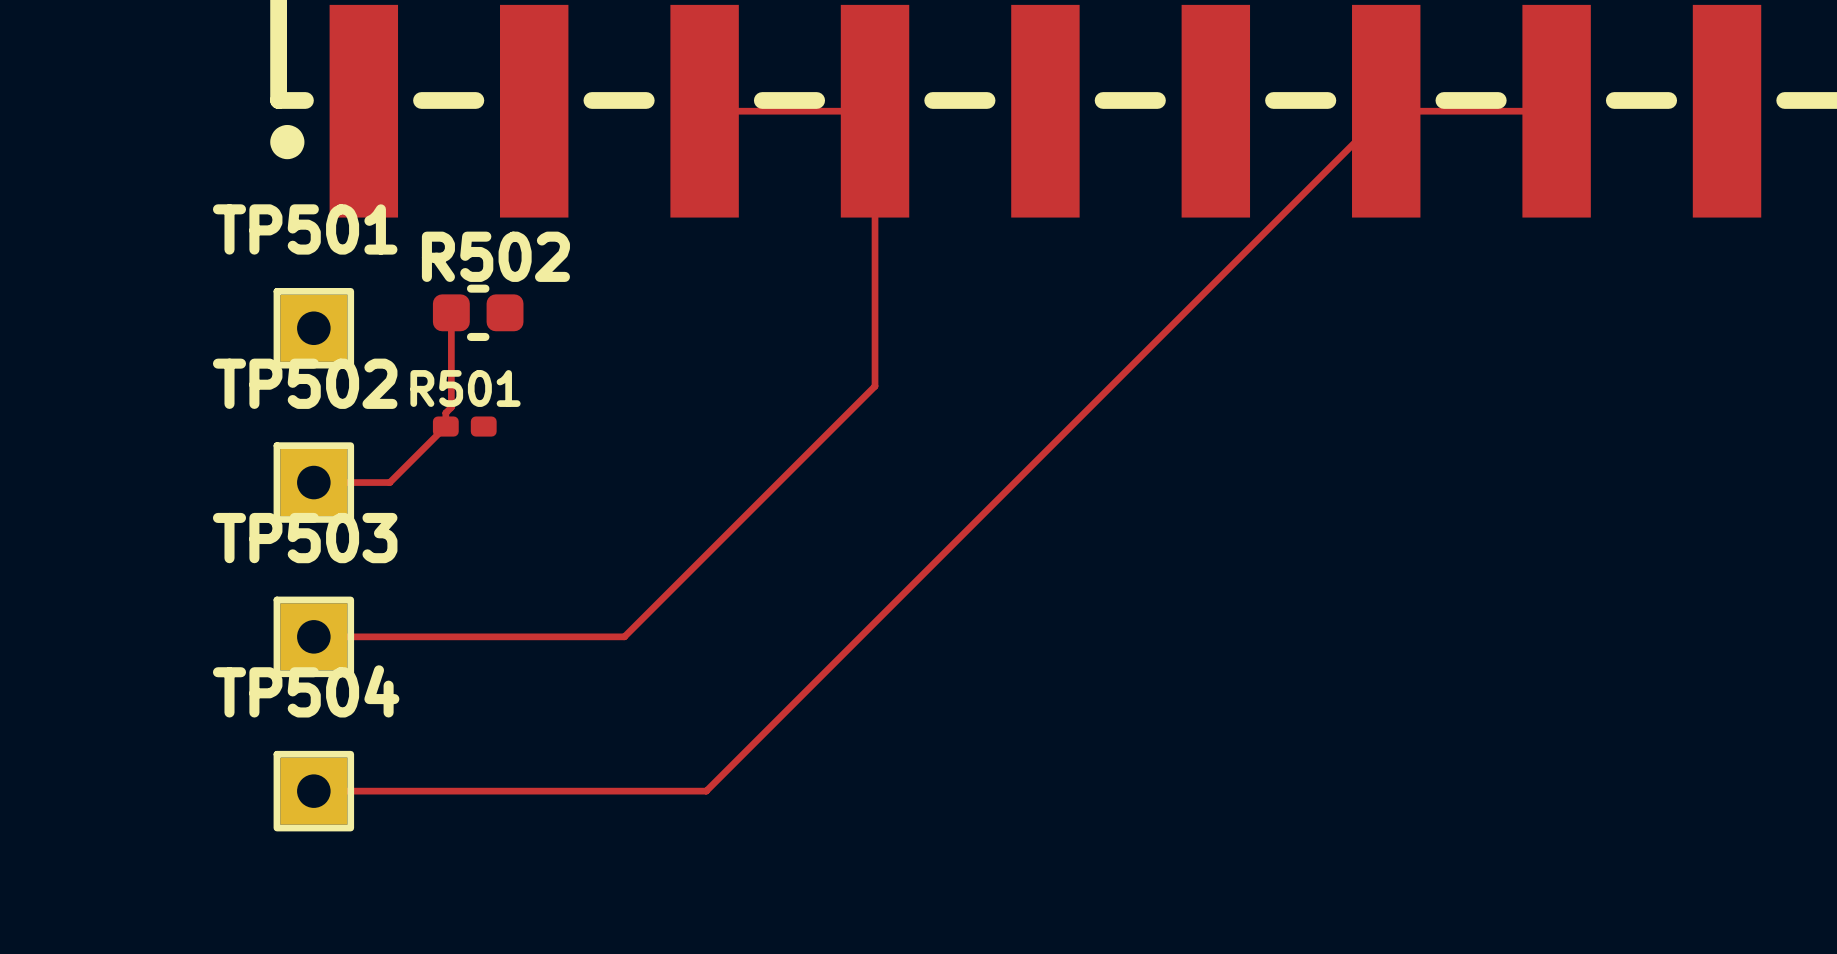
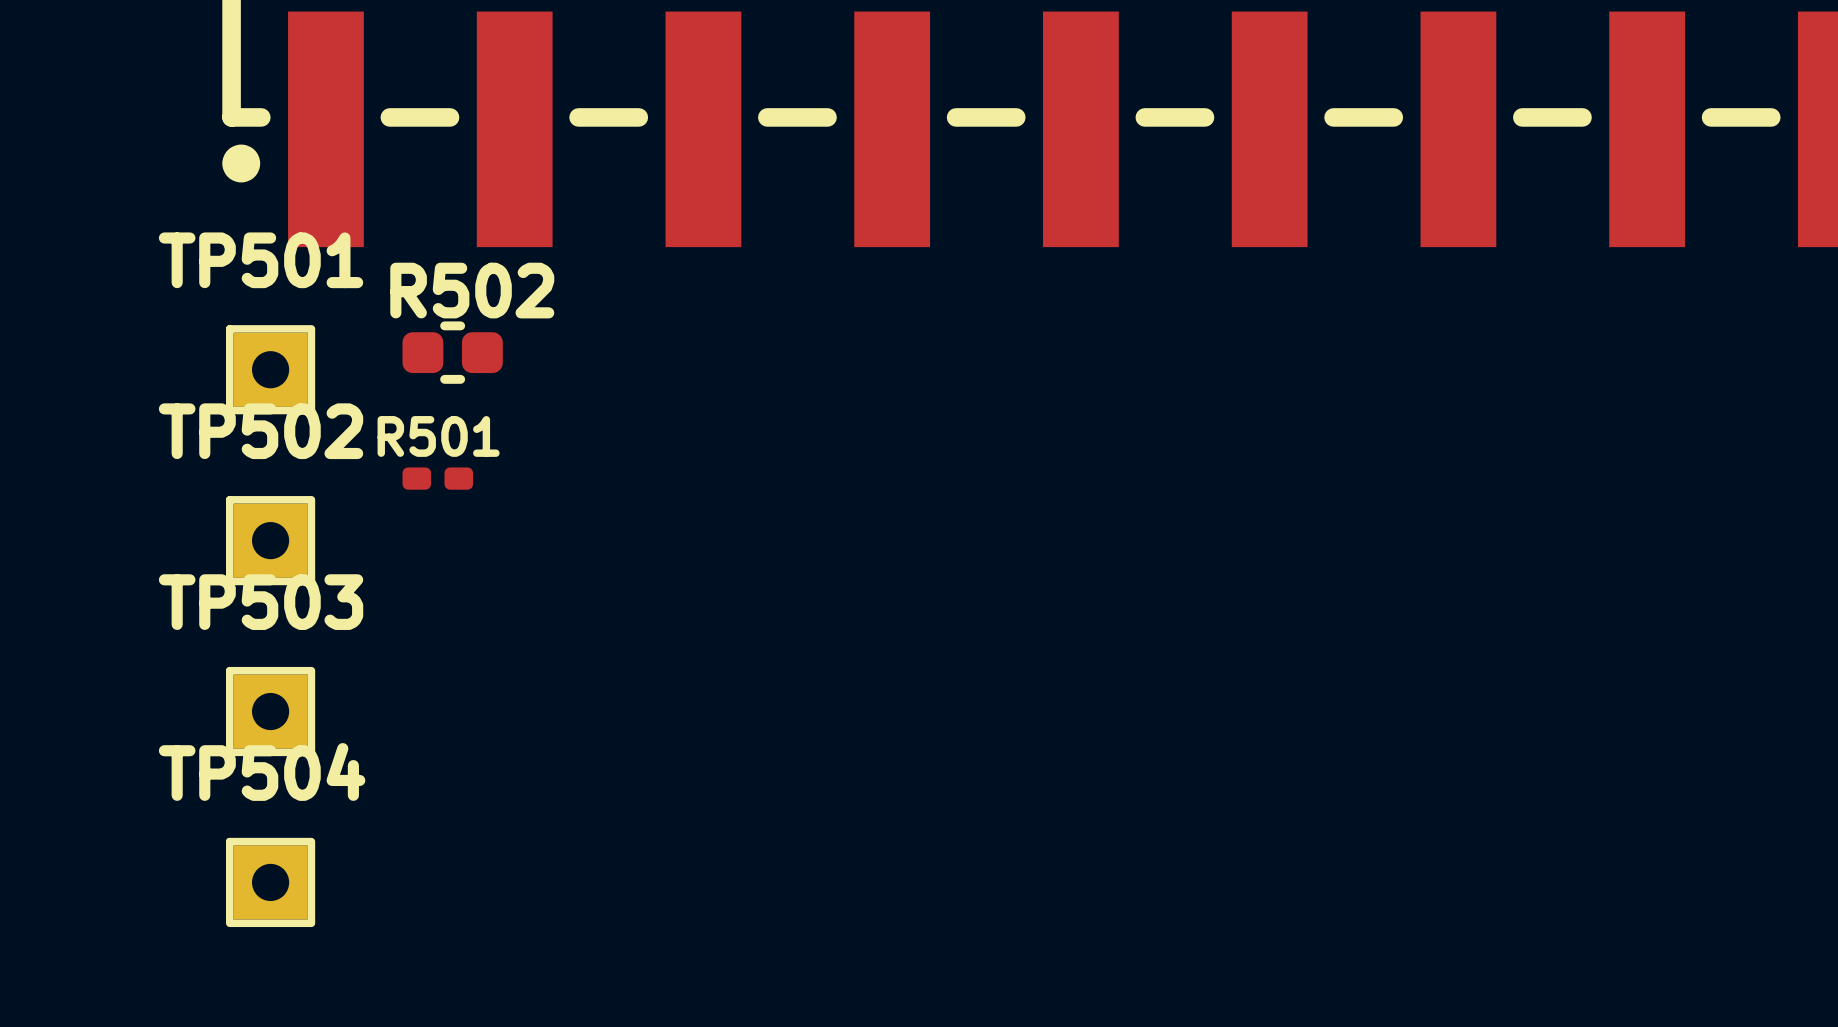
top track: (704, 111) (875, 111) (875, 386) (624, 636) (313, 636) -> none
top track: (1556, 111) (1386, 111) (706, 791) (313, 791) -> none
top track: (451, 312) (451, 407) (445, 412) (445, 426) (389, 482) (313, 482) -> none

